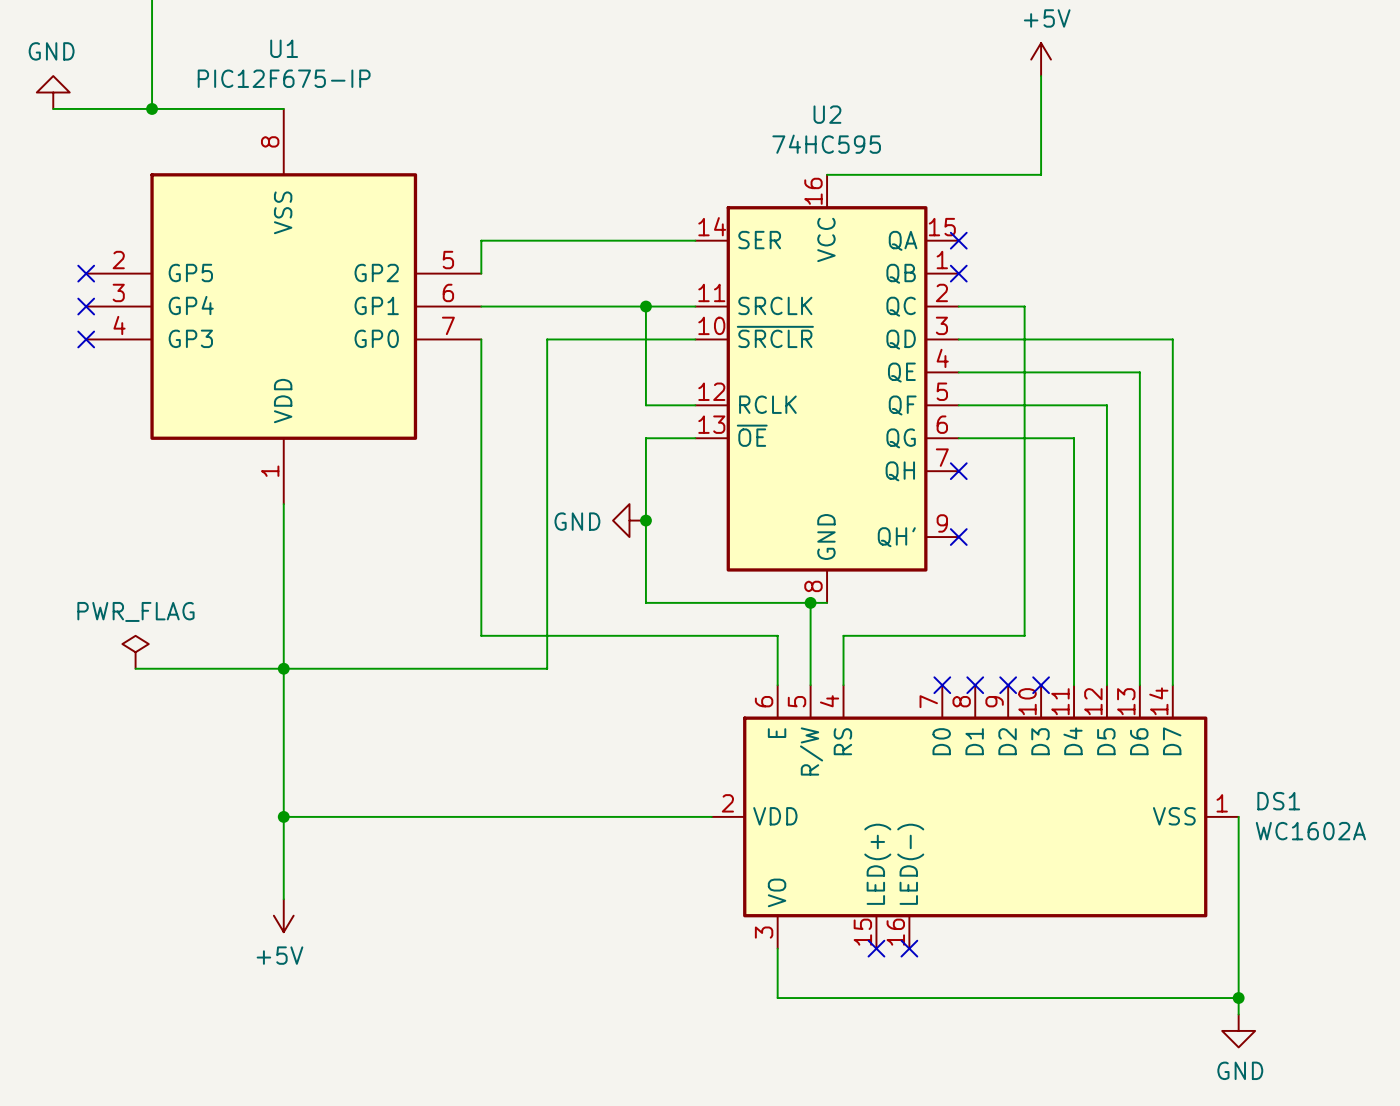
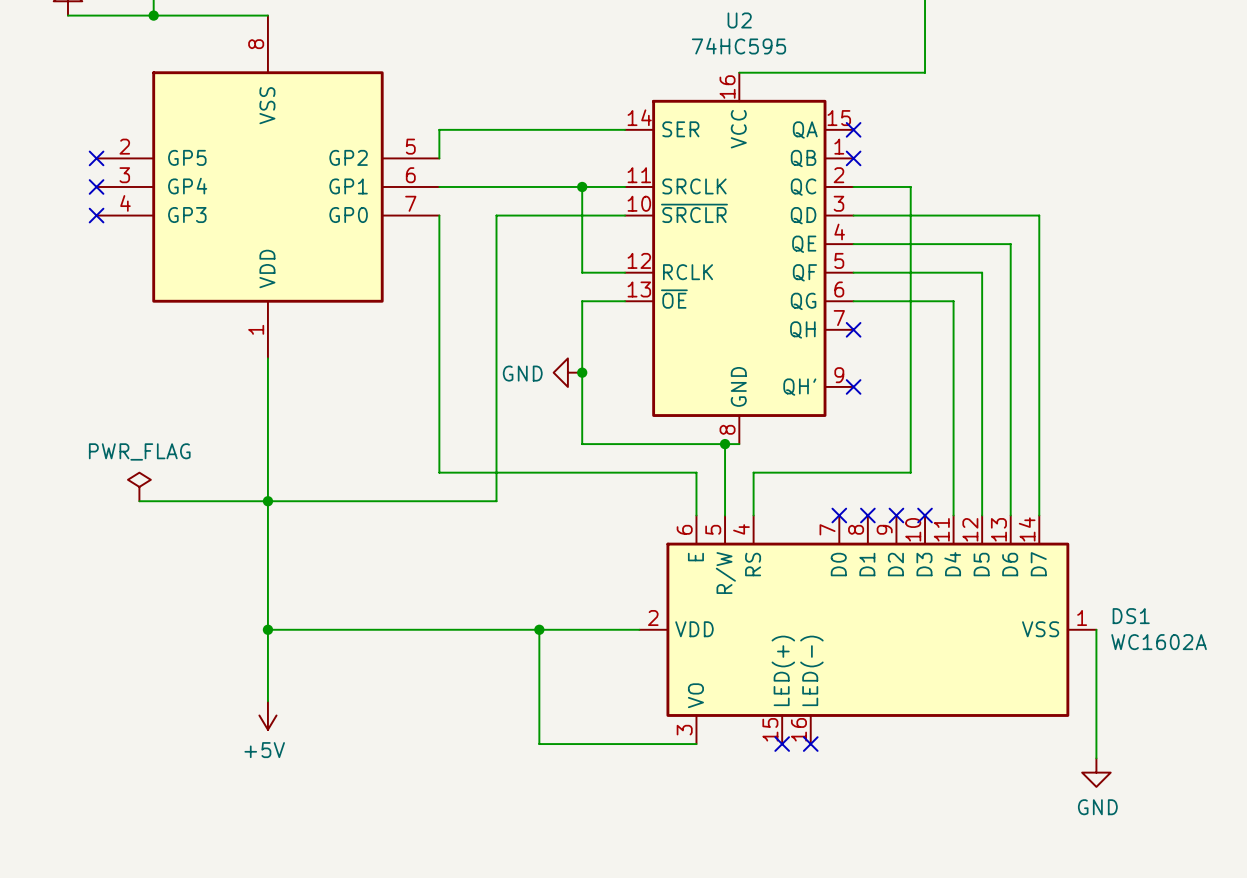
junction: none -> (539, 629)
wire: (777, 948) (777, 998) (1238, 998) -> (696, 744) (539, 744) (539, 629)
wire: (1238, 965) (1238, 1014) -> none
junction: (1238, 998) -> none
power symbol position: GND (1238, 1030) -> GND (1096, 772)

